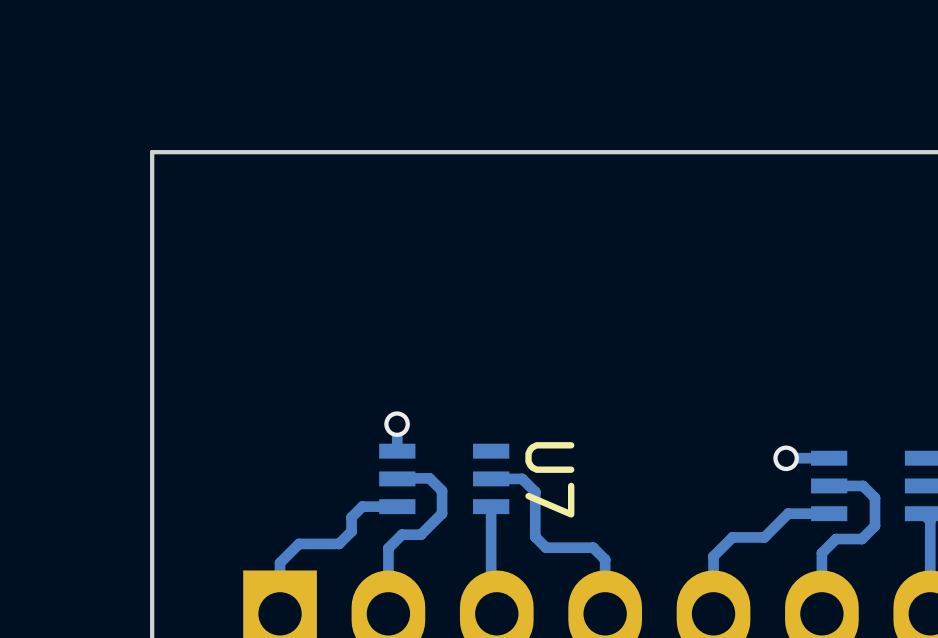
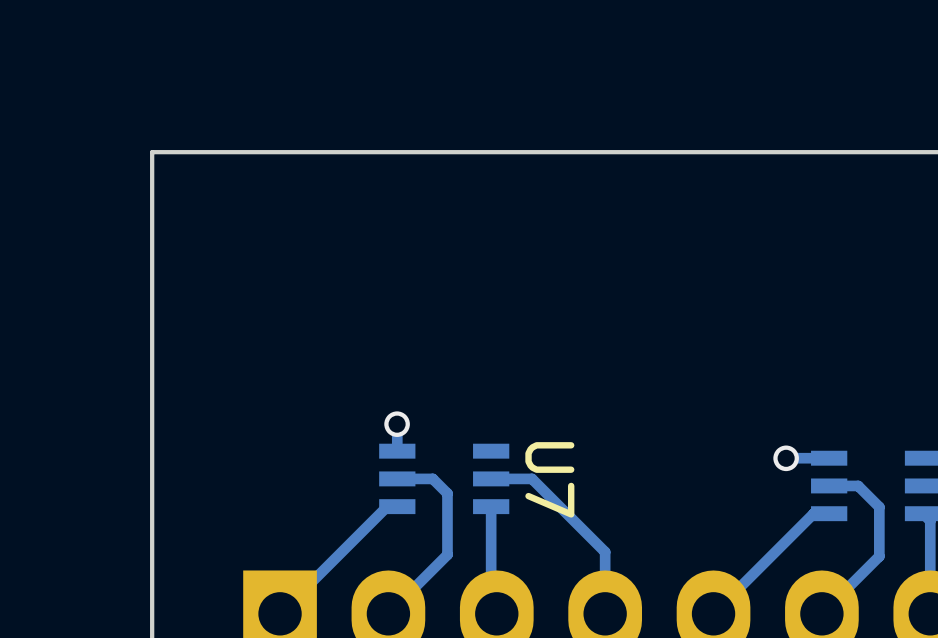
bottom track: (397, 478) (429, 478) (442, 490) (442, 513) (420, 534) (401, 534) (388, 548) (388, 613) -> (397, 478) (432, 478) (447, 493) (447, 554) (388, 613)
bottom track: (522, 478) (535, 491) (535, 536) (546, 547) (593, 547) (605, 559) -> (522, 478) (532, 478) (605, 552) (605, 559)
bottom track: (858, 485) (863, 485) (875, 497) (875, 526) (862, 539) (835, 539) (821, 553) (821, 613) -> (858, 485) (879, 507) (879, 556) (821, 613)
bottom track: (387, 506) (362, 506) (351, 517) (351, 531) (339, 543) (299, 543) (280, 562) (280, 613) -> (387, 506) (280, 613)
bottom track: (813, 513) (788, 513) (764, 537) (732, 537) (713, 556) (713, 613) -> (813, 513) (713, 613)

